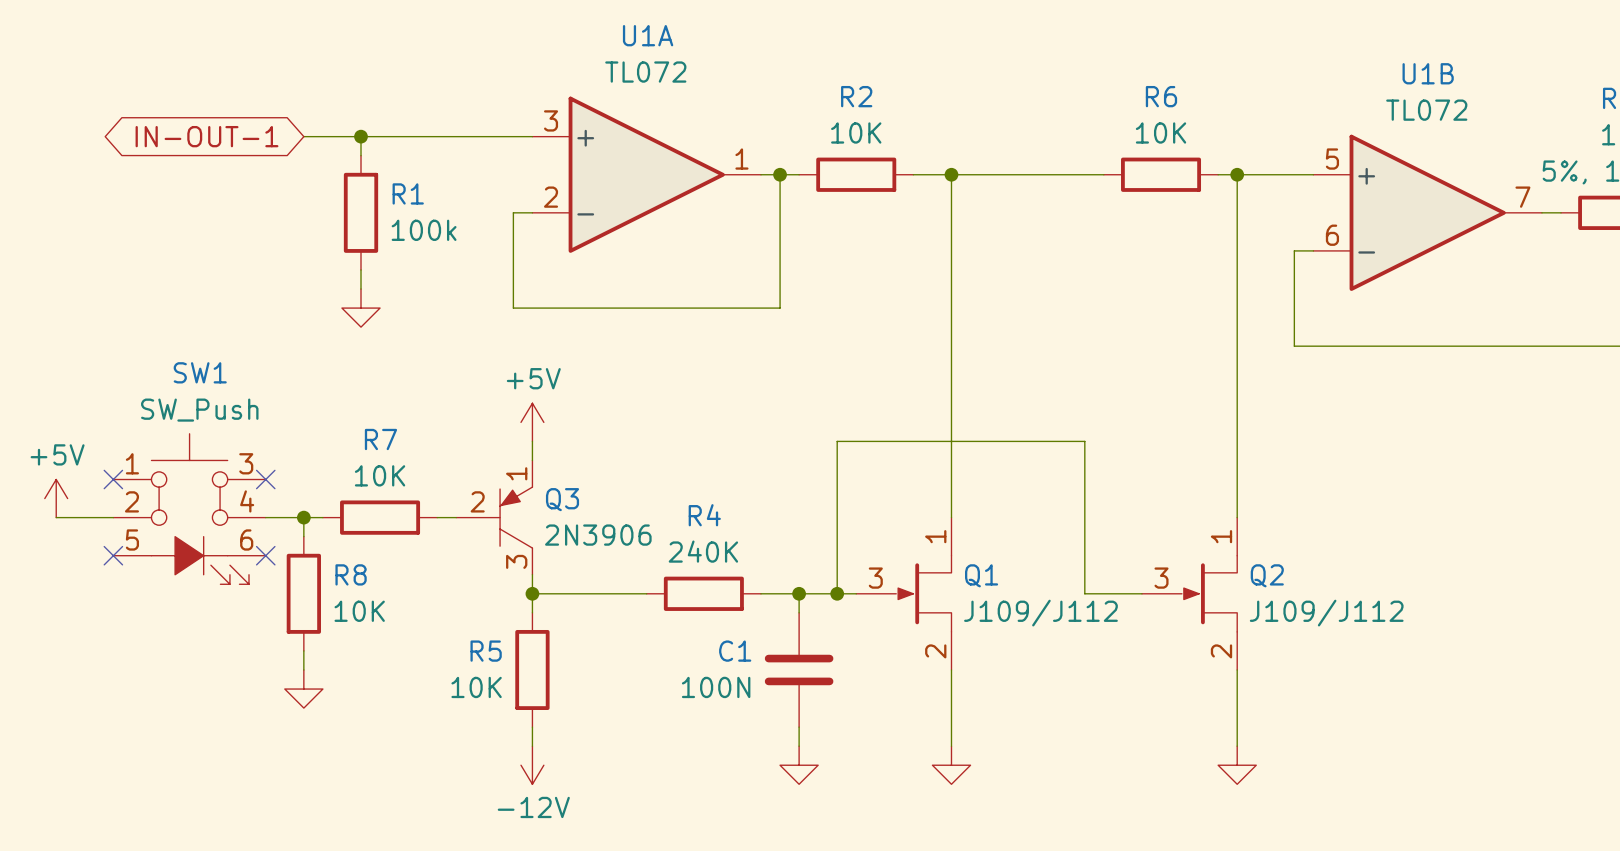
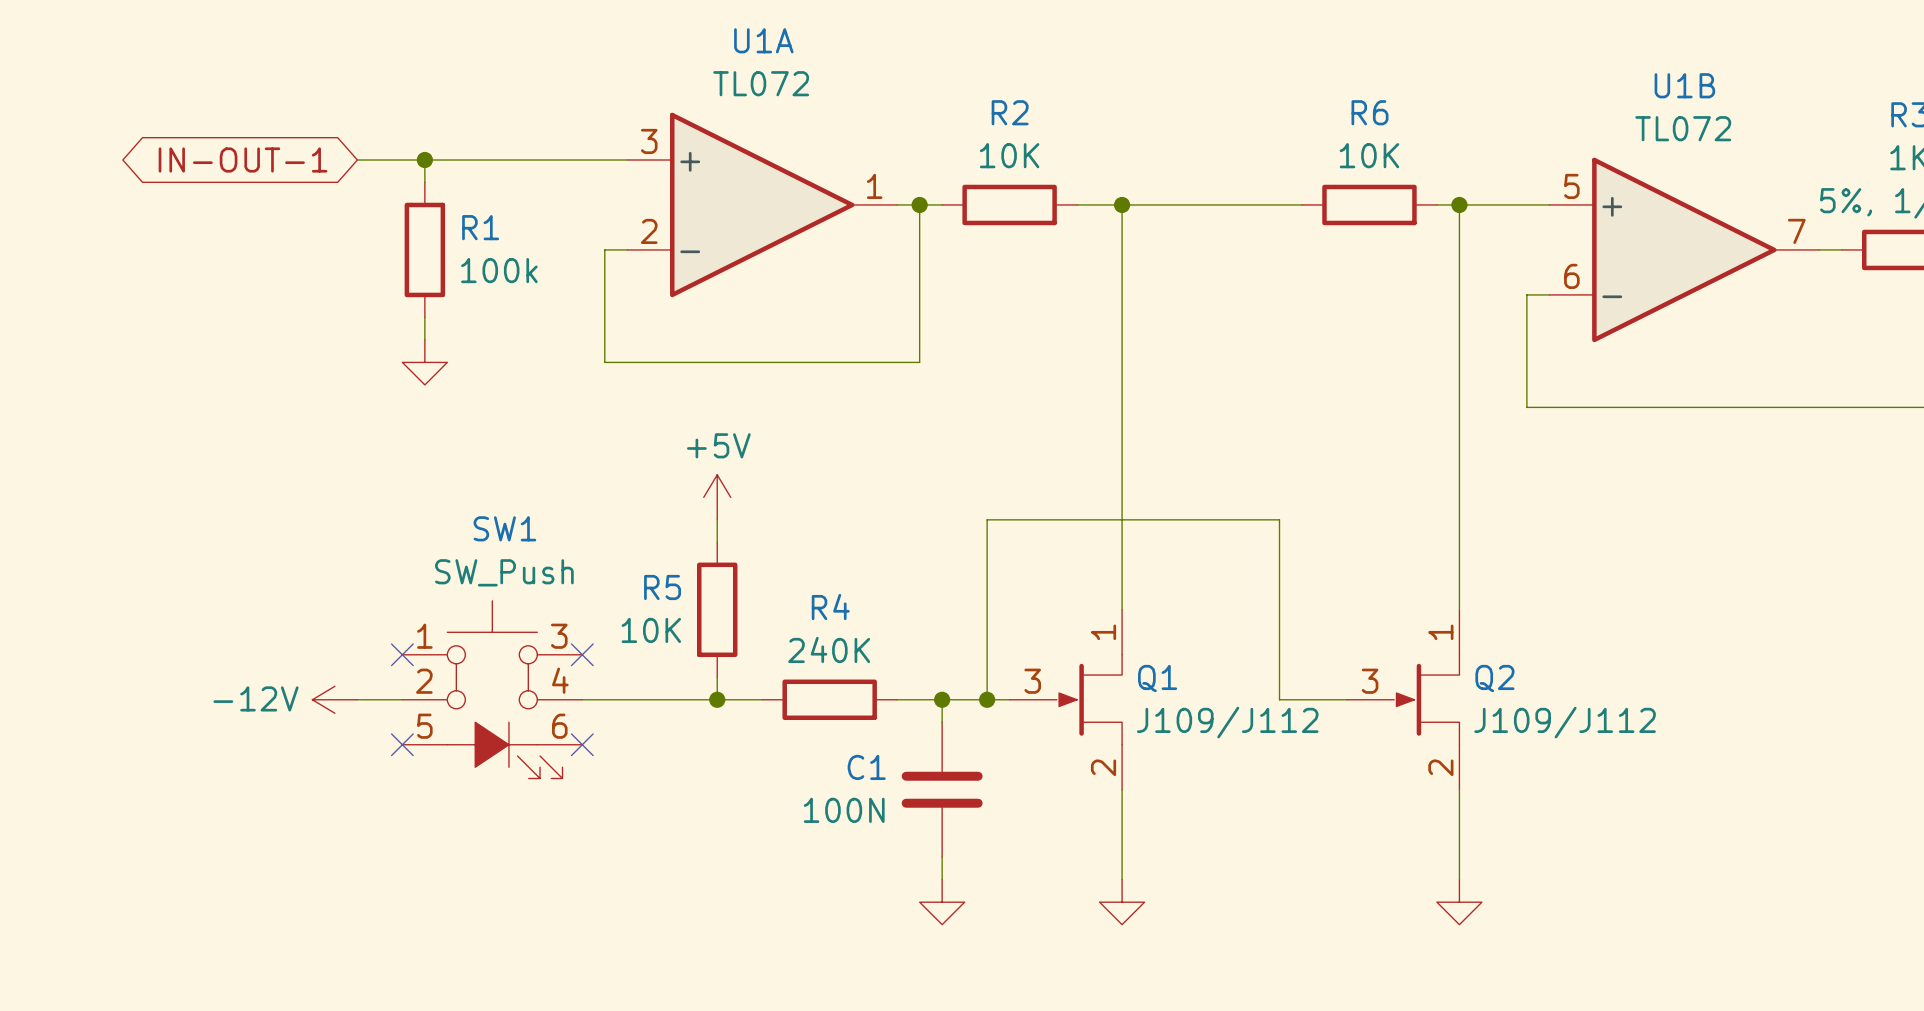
power symbol position: +5V (532, 422) -> +5V (717, 497)
wire: (532, 441) (532, 460) -> none
no-connect mark: (113, 479) -> none
no-connect mark: (265, 479) -> none
power symbol: +5V (56, 498) -> none
SW1 position: (189, 509) -> (492, 689)
wire: (56, 517) (113, 517) -> none
wire: (265, 517) (322, 517) -> none
wire: (303, 517) (303, 536) -> (717, 519) (717, 542)
junction: (303, 517) -> none
R7: 10K (380, 517) -> none
wire: (437, 517) (456, 517) -> none
Q3: 2N3906 (494, 517) -> none
no-connect mark: (113, 555) -> none
no-connect mark: (265, 555) -> none
no-connect mark: none -> (402, 654)
no-connect mark: none -> (582, 654)
wire: (532, 574) (532, 612) -> none
wire: none -> (357, 699) (402, 699)
R8: 10K (303, 593) -> none
wire: none -> (582, 699) (627, 699)
junction position: (532, 593) -> (717, 699)
no-connect mark: none -> (402, 744)
no-connect mark: none -> (582, 744)
wire: (303, 650) (303, 669) -> (717, 677) (717, 699)
R5 position: (532, 669) -> (717, 609)
power symbol: (303, 689) -> none
wire: (532, 727) (532, 746) -> none
power symbol rotation: 0° (532, 765) -> 90° clockwise (334, 699)
power symbol position: -12V (532, 765) -> -12V (334, 699)
power symbol text position: -12V (533, 807) -> -12V (256, 698)

